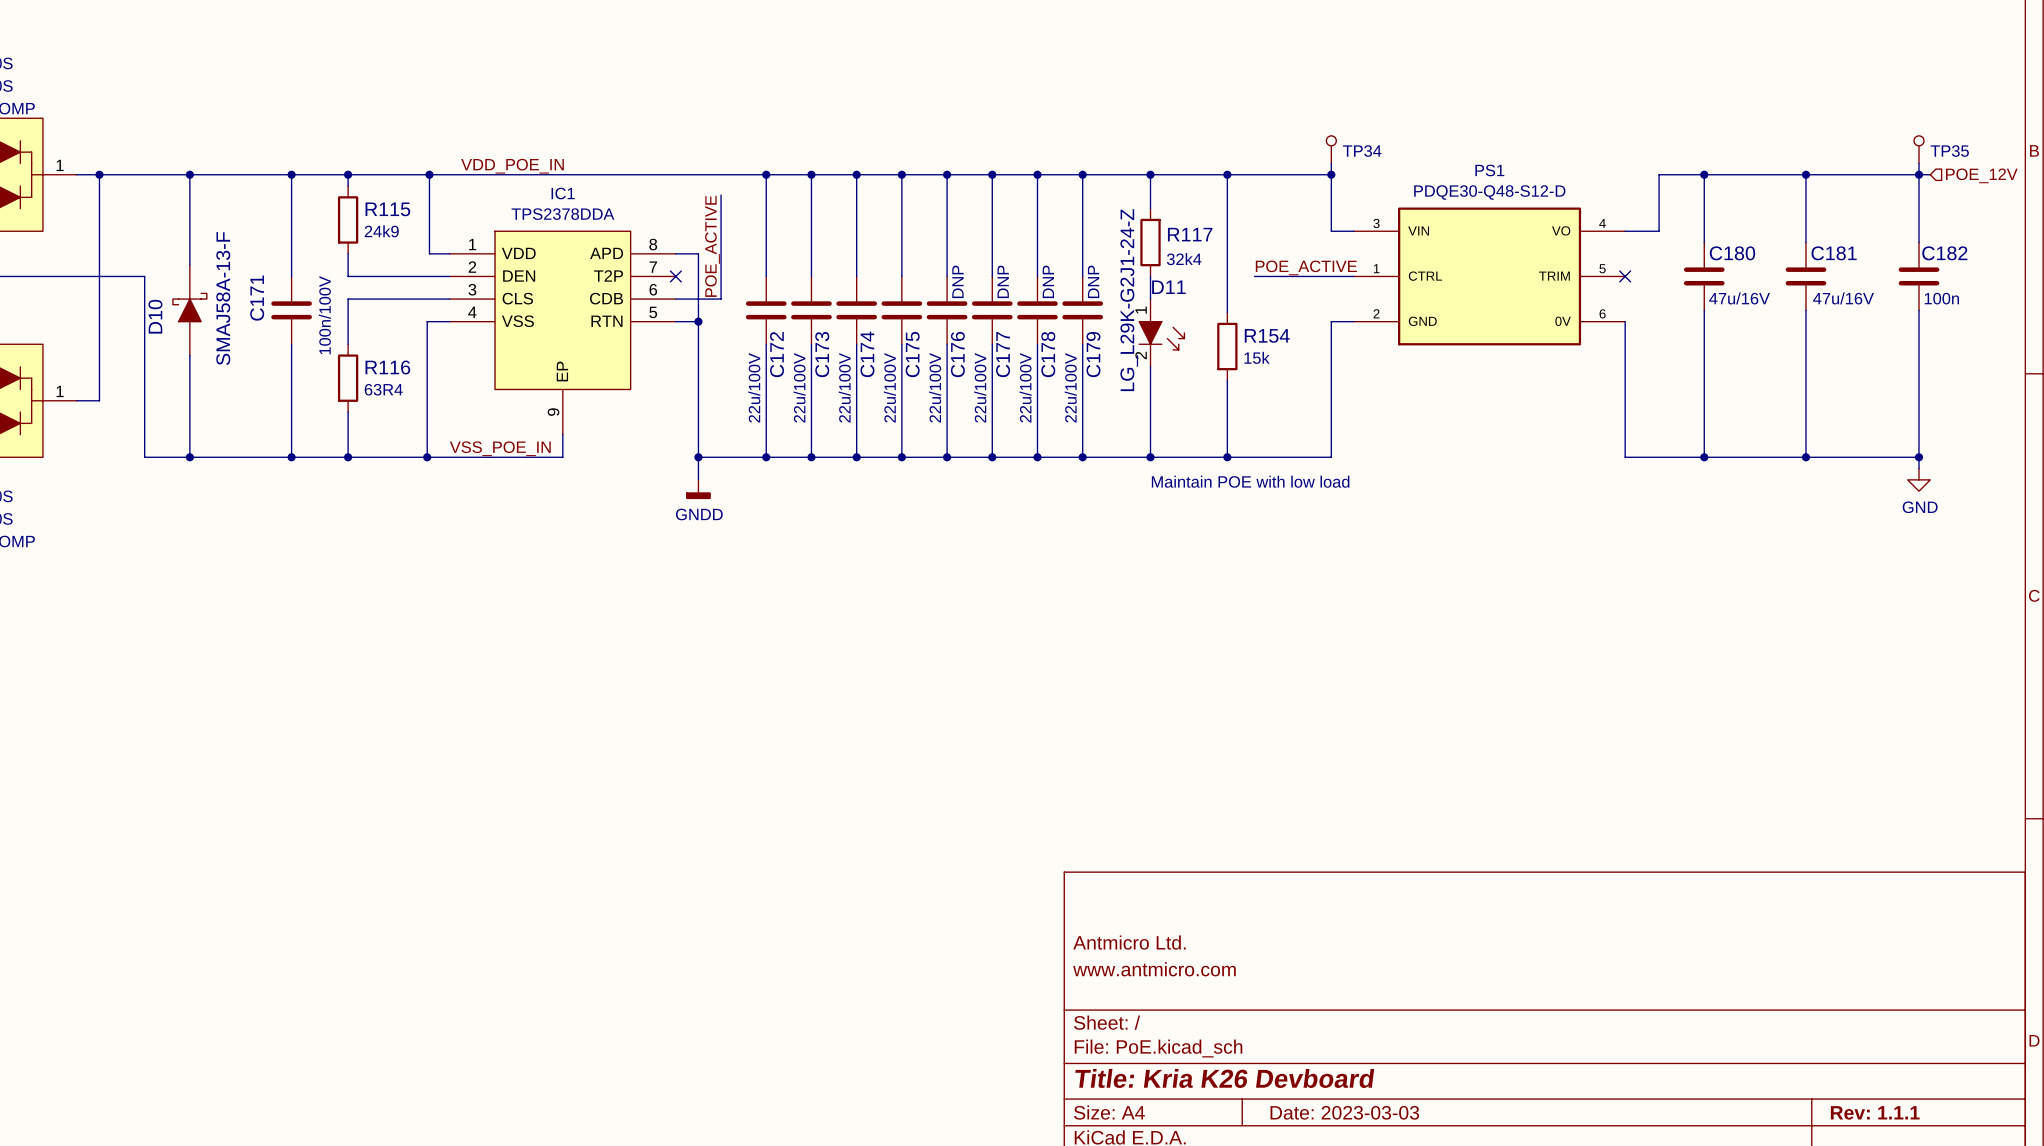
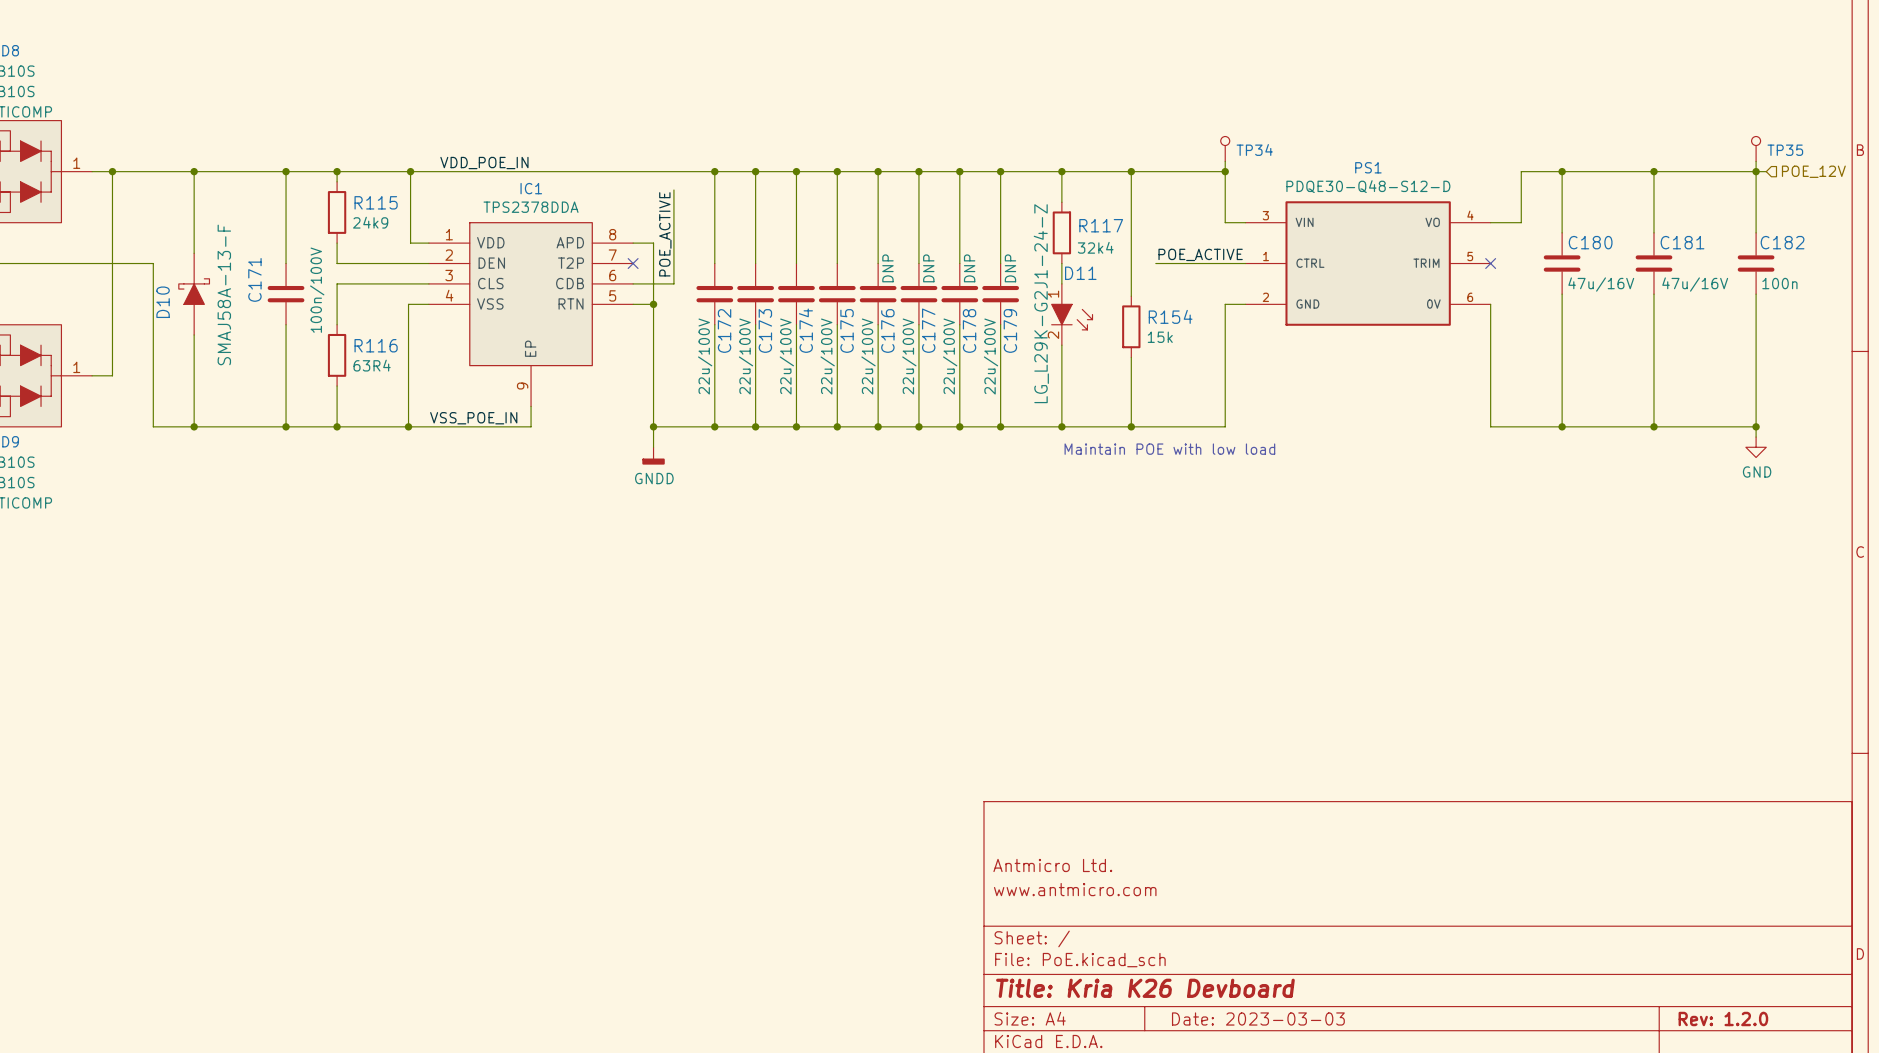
title block: Rev: 1.1.1 (1875, 1112) -> Rev: 1.2.0 (1723, 1018)

